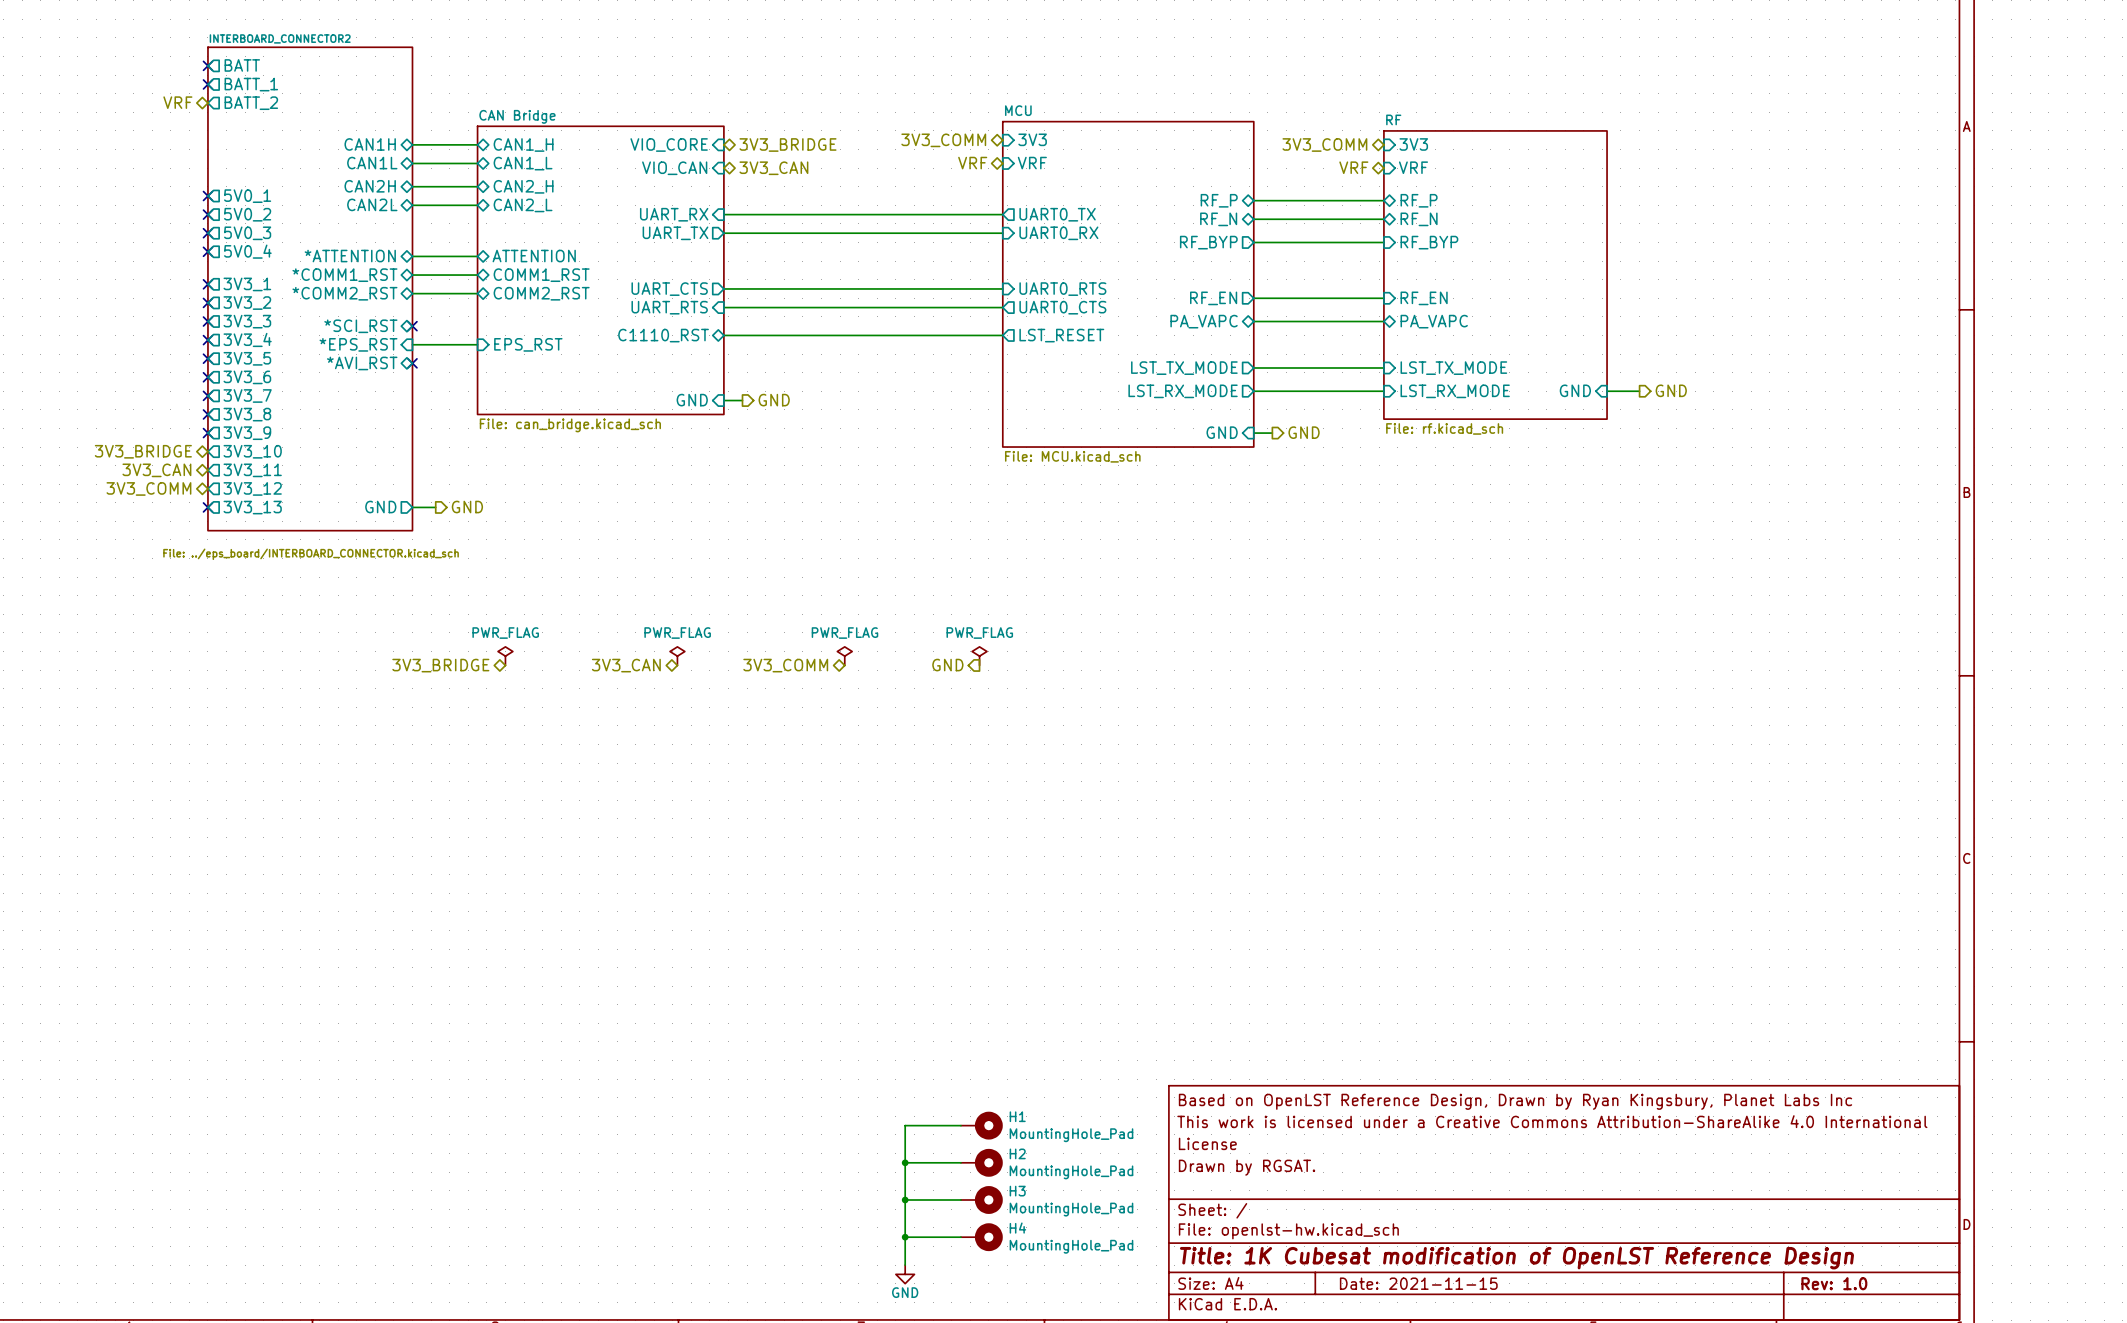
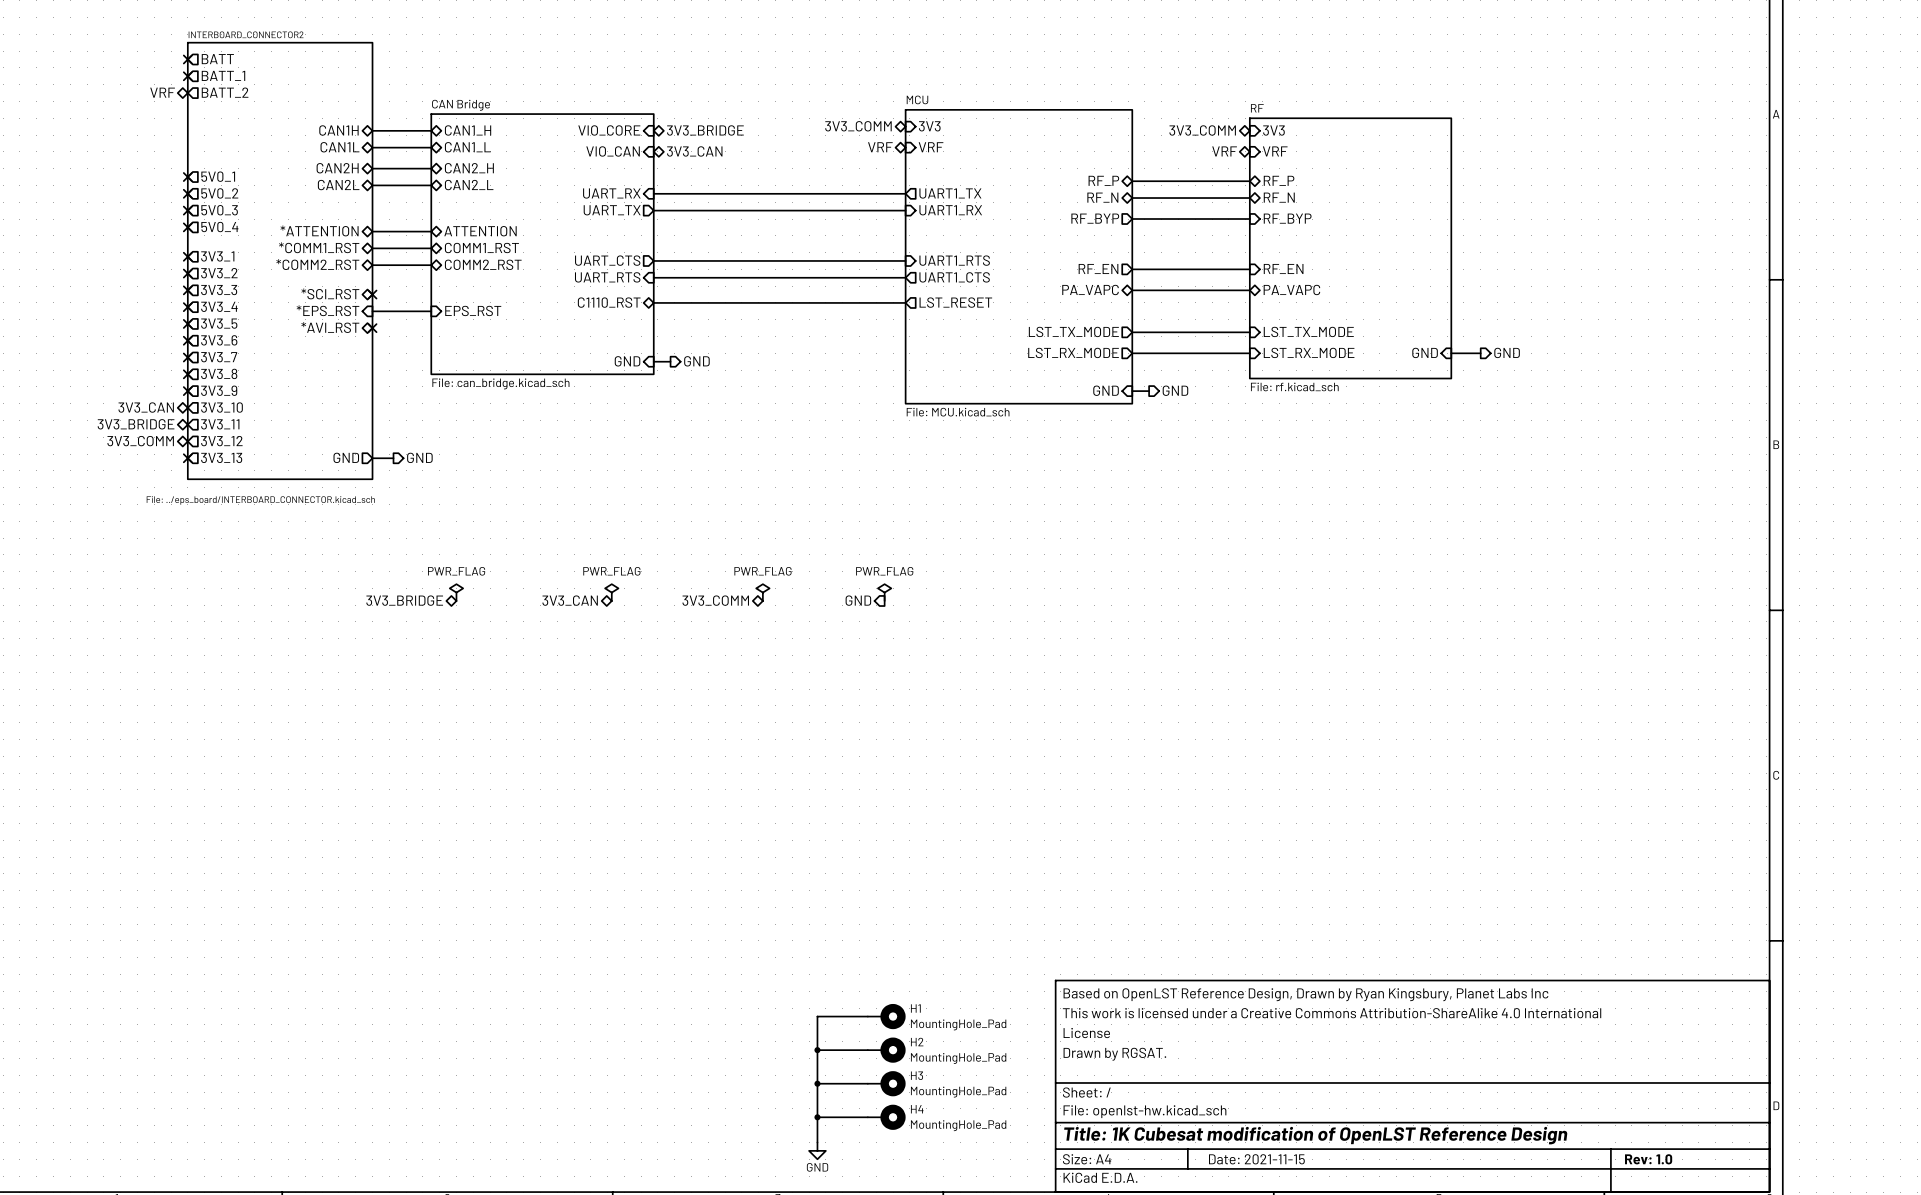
sheet pin: UART0_TX (1057, 214) -> UART1_TX (950, 193)
sheet pin: UART0_RX (1058, 233) -> UART1_RX (950, 210)
sheet pin: UART0_RTS (1062, 289) -> UART1_RTS (954, 260)
sheet pin: UART0_CTS (1062, 307) -> UART1_CTS (954, 277)
hierarchical label: 3V3_BRIDGE (143, 451) -> 3V3_CAN (146, 407)
hierarchical label: 3V3_CAN (156, 470) -> 3V3_BRIDGE (136, 424)

